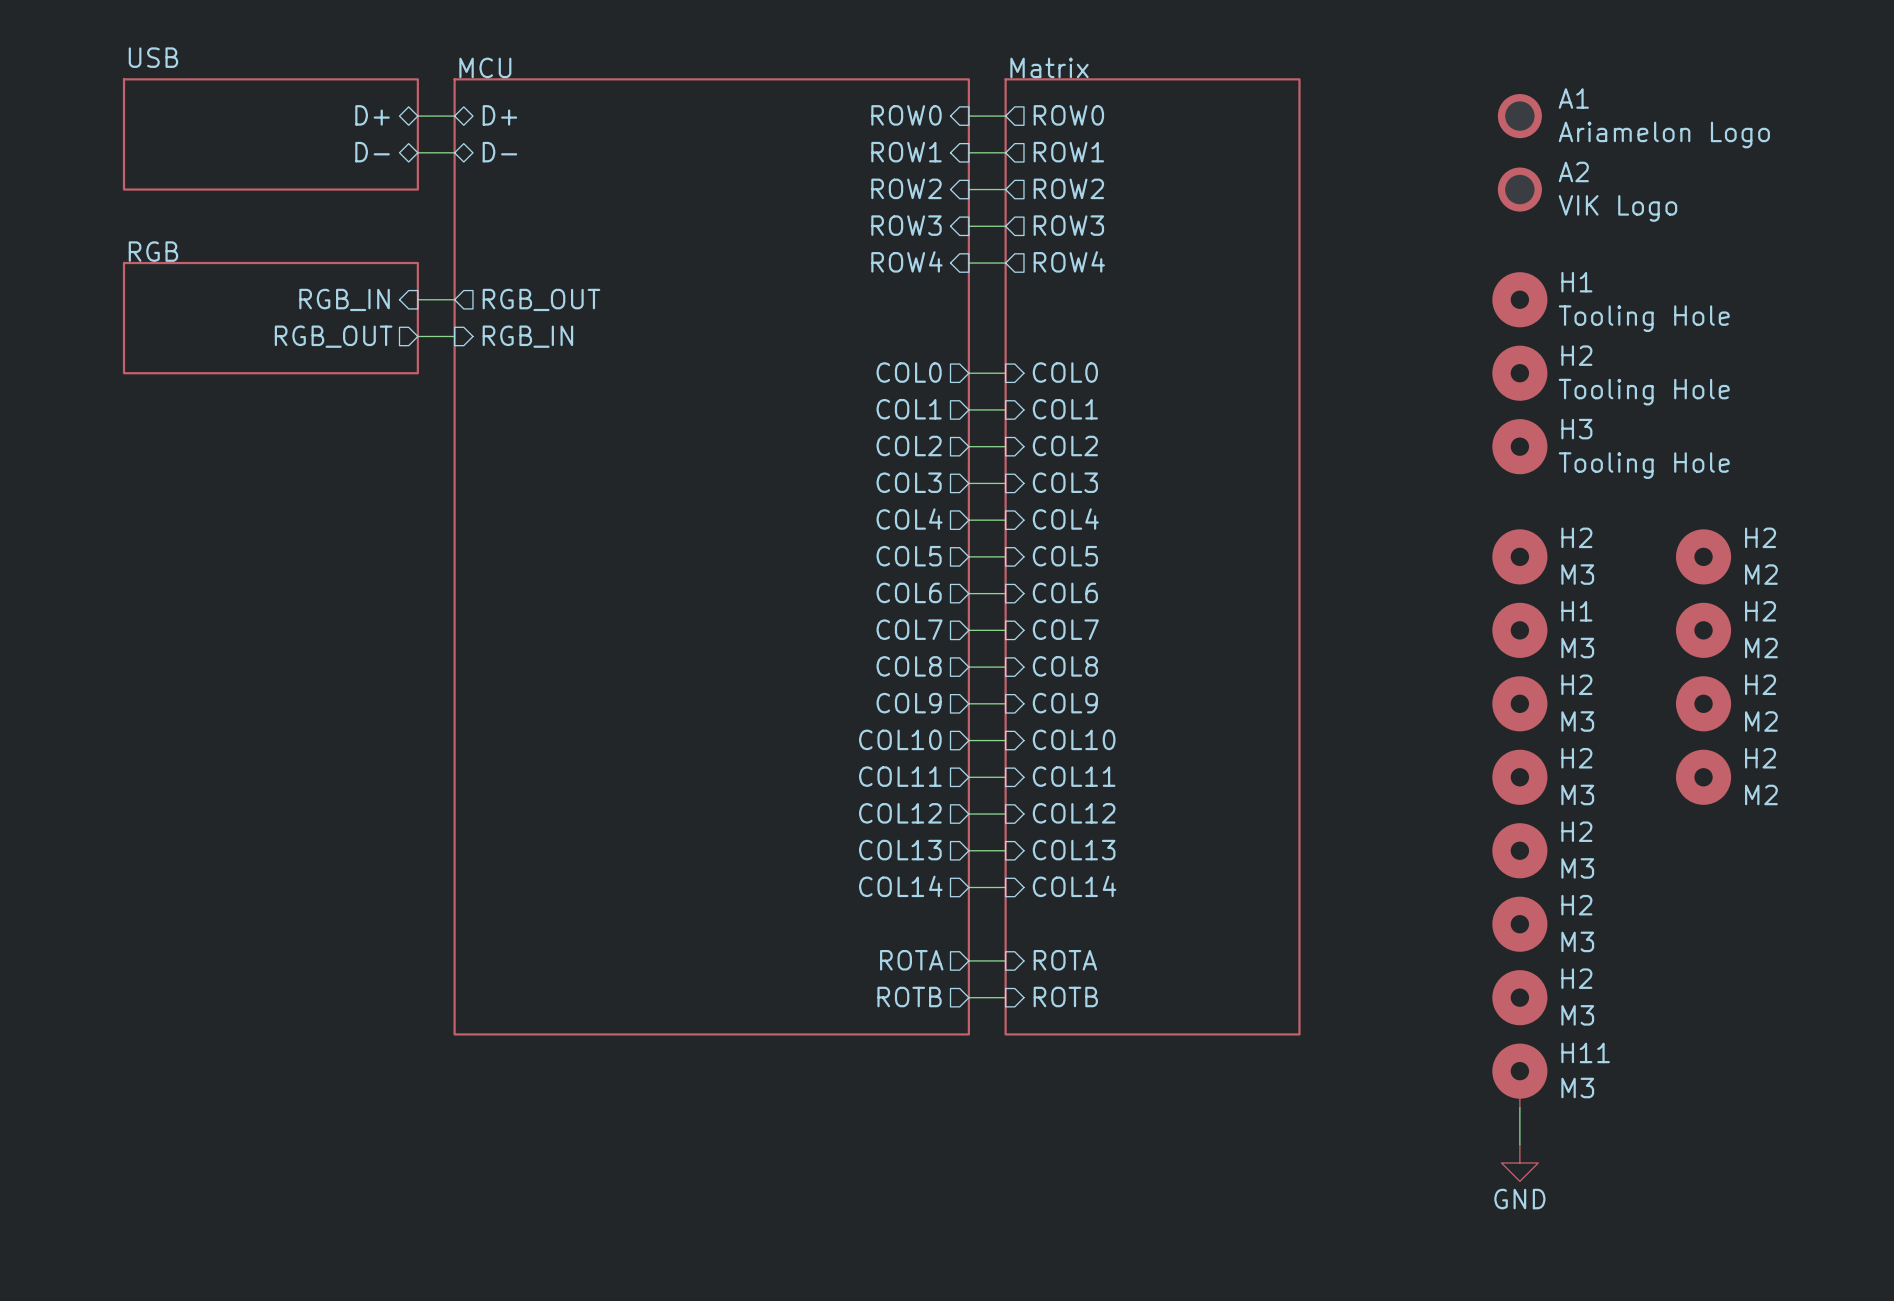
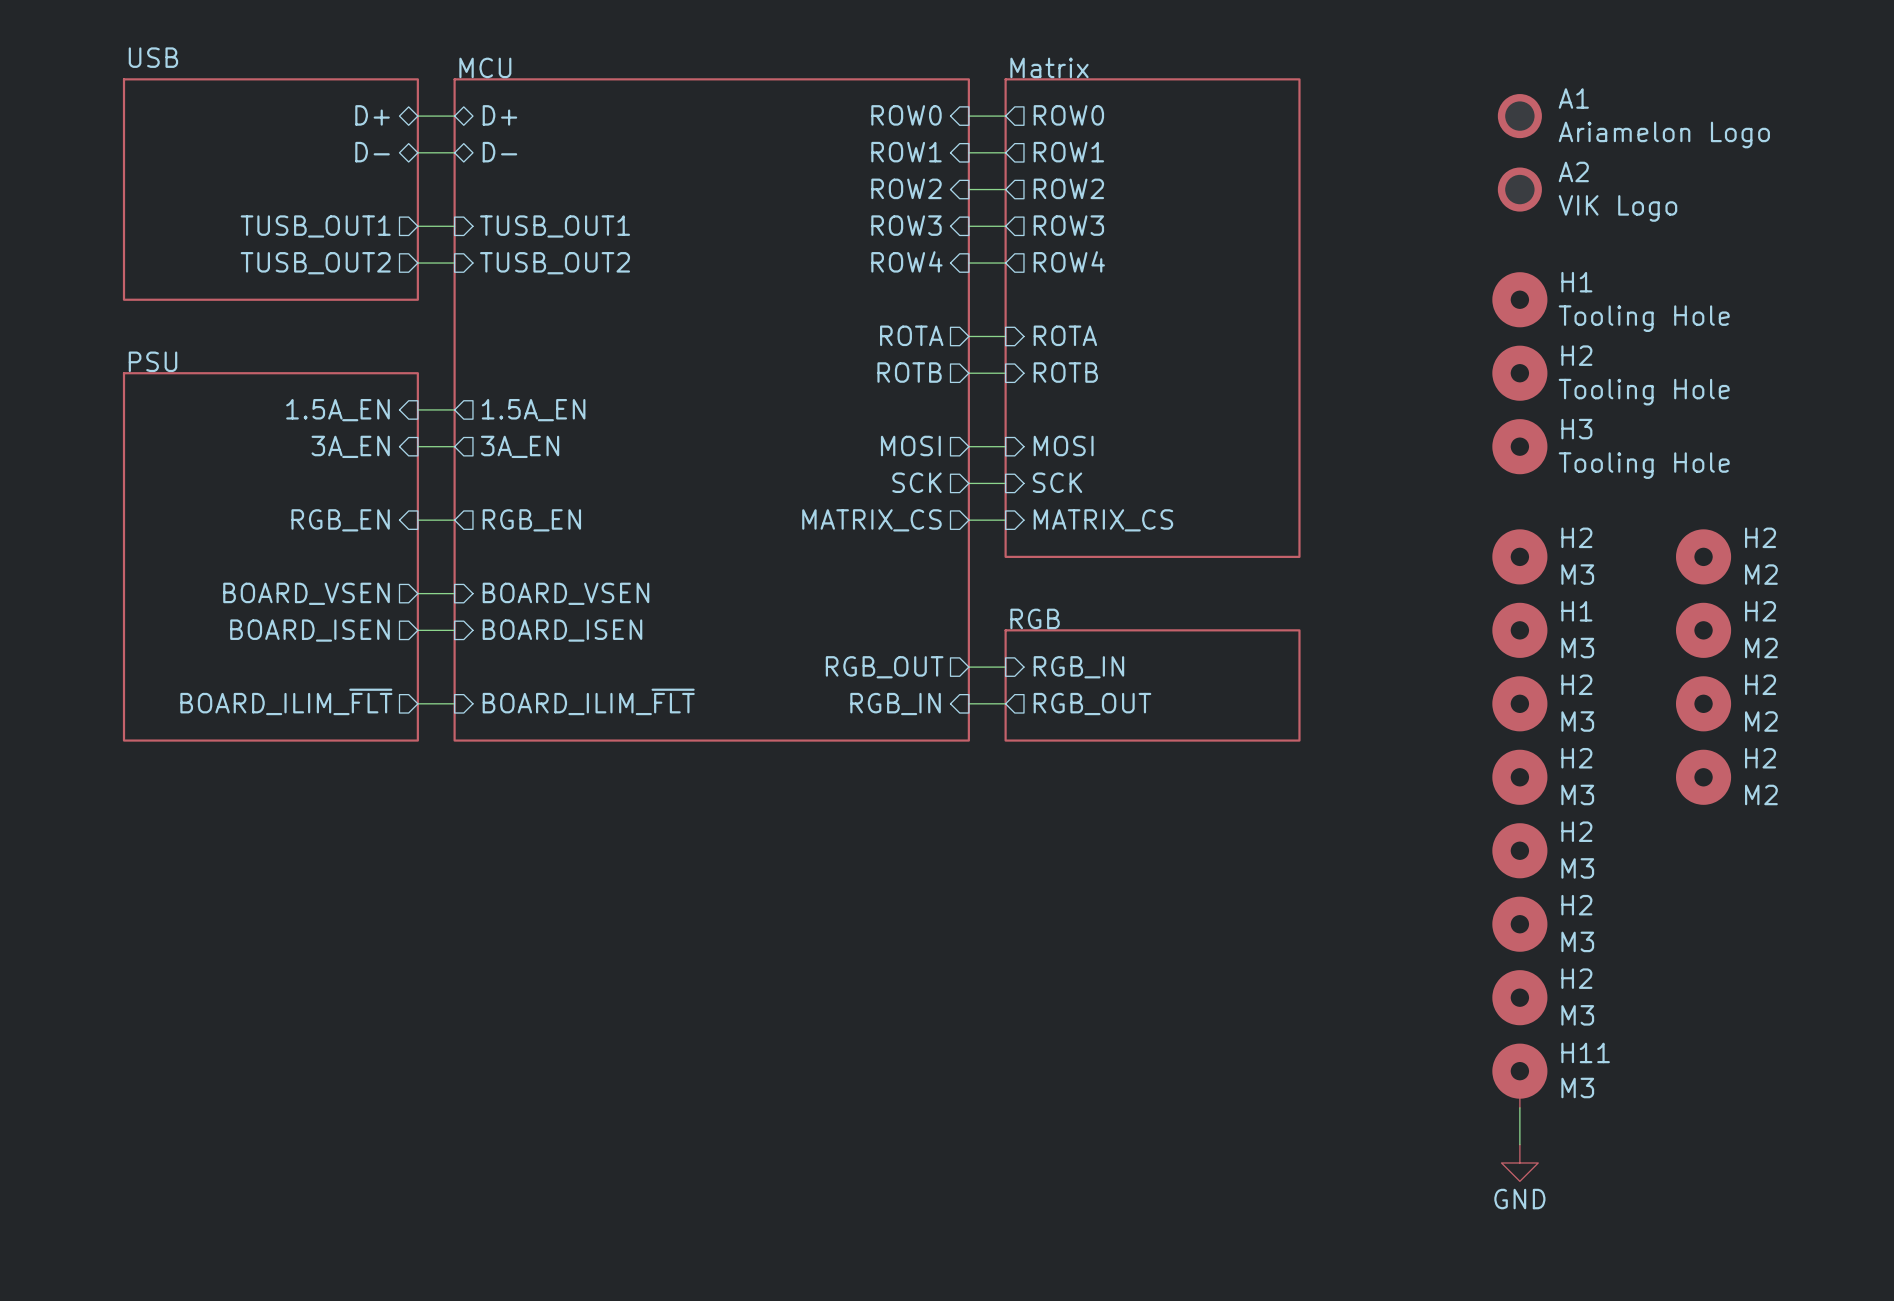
sheet USB: (270, 134) -> none
sheet USB: none -> (270, 189)
sheet pin: none -> TUSB_OUT1 (315, 226)
sheet pin: none -> TUSB_OUT1 (555, 226)
sheet pin: none -> TUSB_OUT2 (315, 263)
sheet pin: RGB_IN (344, 299) -> none
wire: (417, 299) (454, 299) -> (417, 226) (454, 226)
sheet pin shape: output (541, 299) -> input (555, 263)
sheet pin: RGB_OUT (541, 299) -> TUSB_OUT2 (555, 263)
sheet RGB: (270, 318) -> none
sheet Matrix: none -> (1152, 318)
sheet pin: none -> ROTA (911, 335)
sheet pin: none -> ROTA (1065, 335)
sheet pin: RGB_OUT (333, 336) -> none
wire: (417, 336) (454, 336) -> (417, 263) (454, 263)
sheet pin: RGB_IN (527, 336) -> none
sheet pin: COL0 (909, 372) -> ROTB (909, 372)
sheet pin: COL0 (1065, 372) -> ROTB (1065, 372)
wire: none -> (417, 409) (454, 409)
sheet MCU: none -> (711, 409)
sheet pin: COL1 (909, 409) -> none
wire: (968, 409) (1005, 409) -> (968, 336) (1005, 336)
sheet pin: COL1 (1065, 409) -> none
sheet pin: none -> 1.5A_EN (337, 410)
sheet pin: none -> 1.5A_EN (533, 410)
sheet pin: none -> 3A_EN (350, 446)
wire: none -> (417, 446) (454, 446)
sheet pin: none -> 3A_EN (520, 446)
sheet pin: COL2 (909, 446) -> MOSI (910, 446)
sheet pin: COL2 (1065, 446) -> MOSI (1063, 446)
sheet pin: COL3 (909, 482) -> SCK (916, 482)
sheet pin: COL3 (1065, 482) -> SCK (1057, 482)
sheet pin: COL4 (909, 519) -> MATRIX_CS (871, 520)
sheet pin: COL4 (1065, 519) -> MATRIX_CS (1103, 520)
sheet pin: none -> RGB_EN (340, 520)
wire: none -> (417, 520) (454, 520)
sheet pin: none -> RGB_EN (531, 520)
sheet PSU: none -> (270, 556)
sheet MCU: (711, 556) -> none
sheet pin: COL5 (909, 556) -> none
wire: (968, 556) (1005, 556) -> none
sheet pin: COL5 (1065, 556) -> none
sheet Matrix: (1152, 556) -> none
sheet pin: COL6 (909, 592) -> none
sheet pin: COL6 (1065, 592) -> none
sheet pin: none -> BOARD_VSEN (306, 593)
wire: none -> (417, 593) (454, 593)
sheet pin: none -> BOARD_VSEN (565, 593)
wire: (968, 593) (1005, 593) -> none
sheet pin: COL7 (909, 629) -> none
sheet pin: COL7 (1065, 629) -> none
sheet pin: none -> BOARD_ISEN (310, 630)
wire: none -> (417, 630) (454, 630)
sheet pin: none -> BOARD_ISEN (562, 630)
wire: (968, 630) (1005, 630) -> none
sheet pin: COL8 (909, 666) -> RGB_OUT (884, 667)
sheet pin: COL8 (1065, 666) -> RGB_IN (1078, 667)
sheet RGB: none -> (1152, 685)
sheet pin: none -> BOARD_ILIM_~{FLT} (286, 701)
sheet pin: none -> BOARD_ILIM_~{FLT} (588, 701)
wire: none -> (417, 703) (454, 703)
sheet pin shape: output (909, 703) -> input (895, 704)
sheet pin: COL9 (909, 703) -> RGB_IN (895, 704)
sheet pin shape: input (1065, 703) -> output (1092, 704)
sheet pin: COL9 (1065, 703) -> RGB_OUT (1092, 704)
sheet pin: COL10 (900, 739) -> none
sheet pin: COL10 (1074, 739) -> none
wire: (968, 740) (1005, 740) -> none
sheet pin: COL11 (900, 776) -> none
sheet pin: COL11 (1074, 776) -> none
wire: (968, 777) (1005, 777) -> none
sheet pin: COL12 (900, 813) -> none
sheet pin: COL12 (1074, 813) -> none
wire: (968, 814) (1005, 814) -> none
sheet pin: COL13 (900, 850) -> none
wire: (968, 850) (1005, 850) -> none
sheet pin: COL13 (1074, 850) -> none
sheet pin: COL14 (900, 886) -> none
sheet pin: COL14 (1074, 886) -> none
wire: (968, 887) (1005, 887) -> none
sheet pin: ROTA (911, 960) -> none
wire: (968, 960) (1005, 960) -> none
sheet pin: ROTA (1065, 960) -> none
sheet pin: ROTB (909, 997) -> none
wire: (968, 997) (1005, 997) -> none
sheet pin: ROTB (1065, 997) -> none

